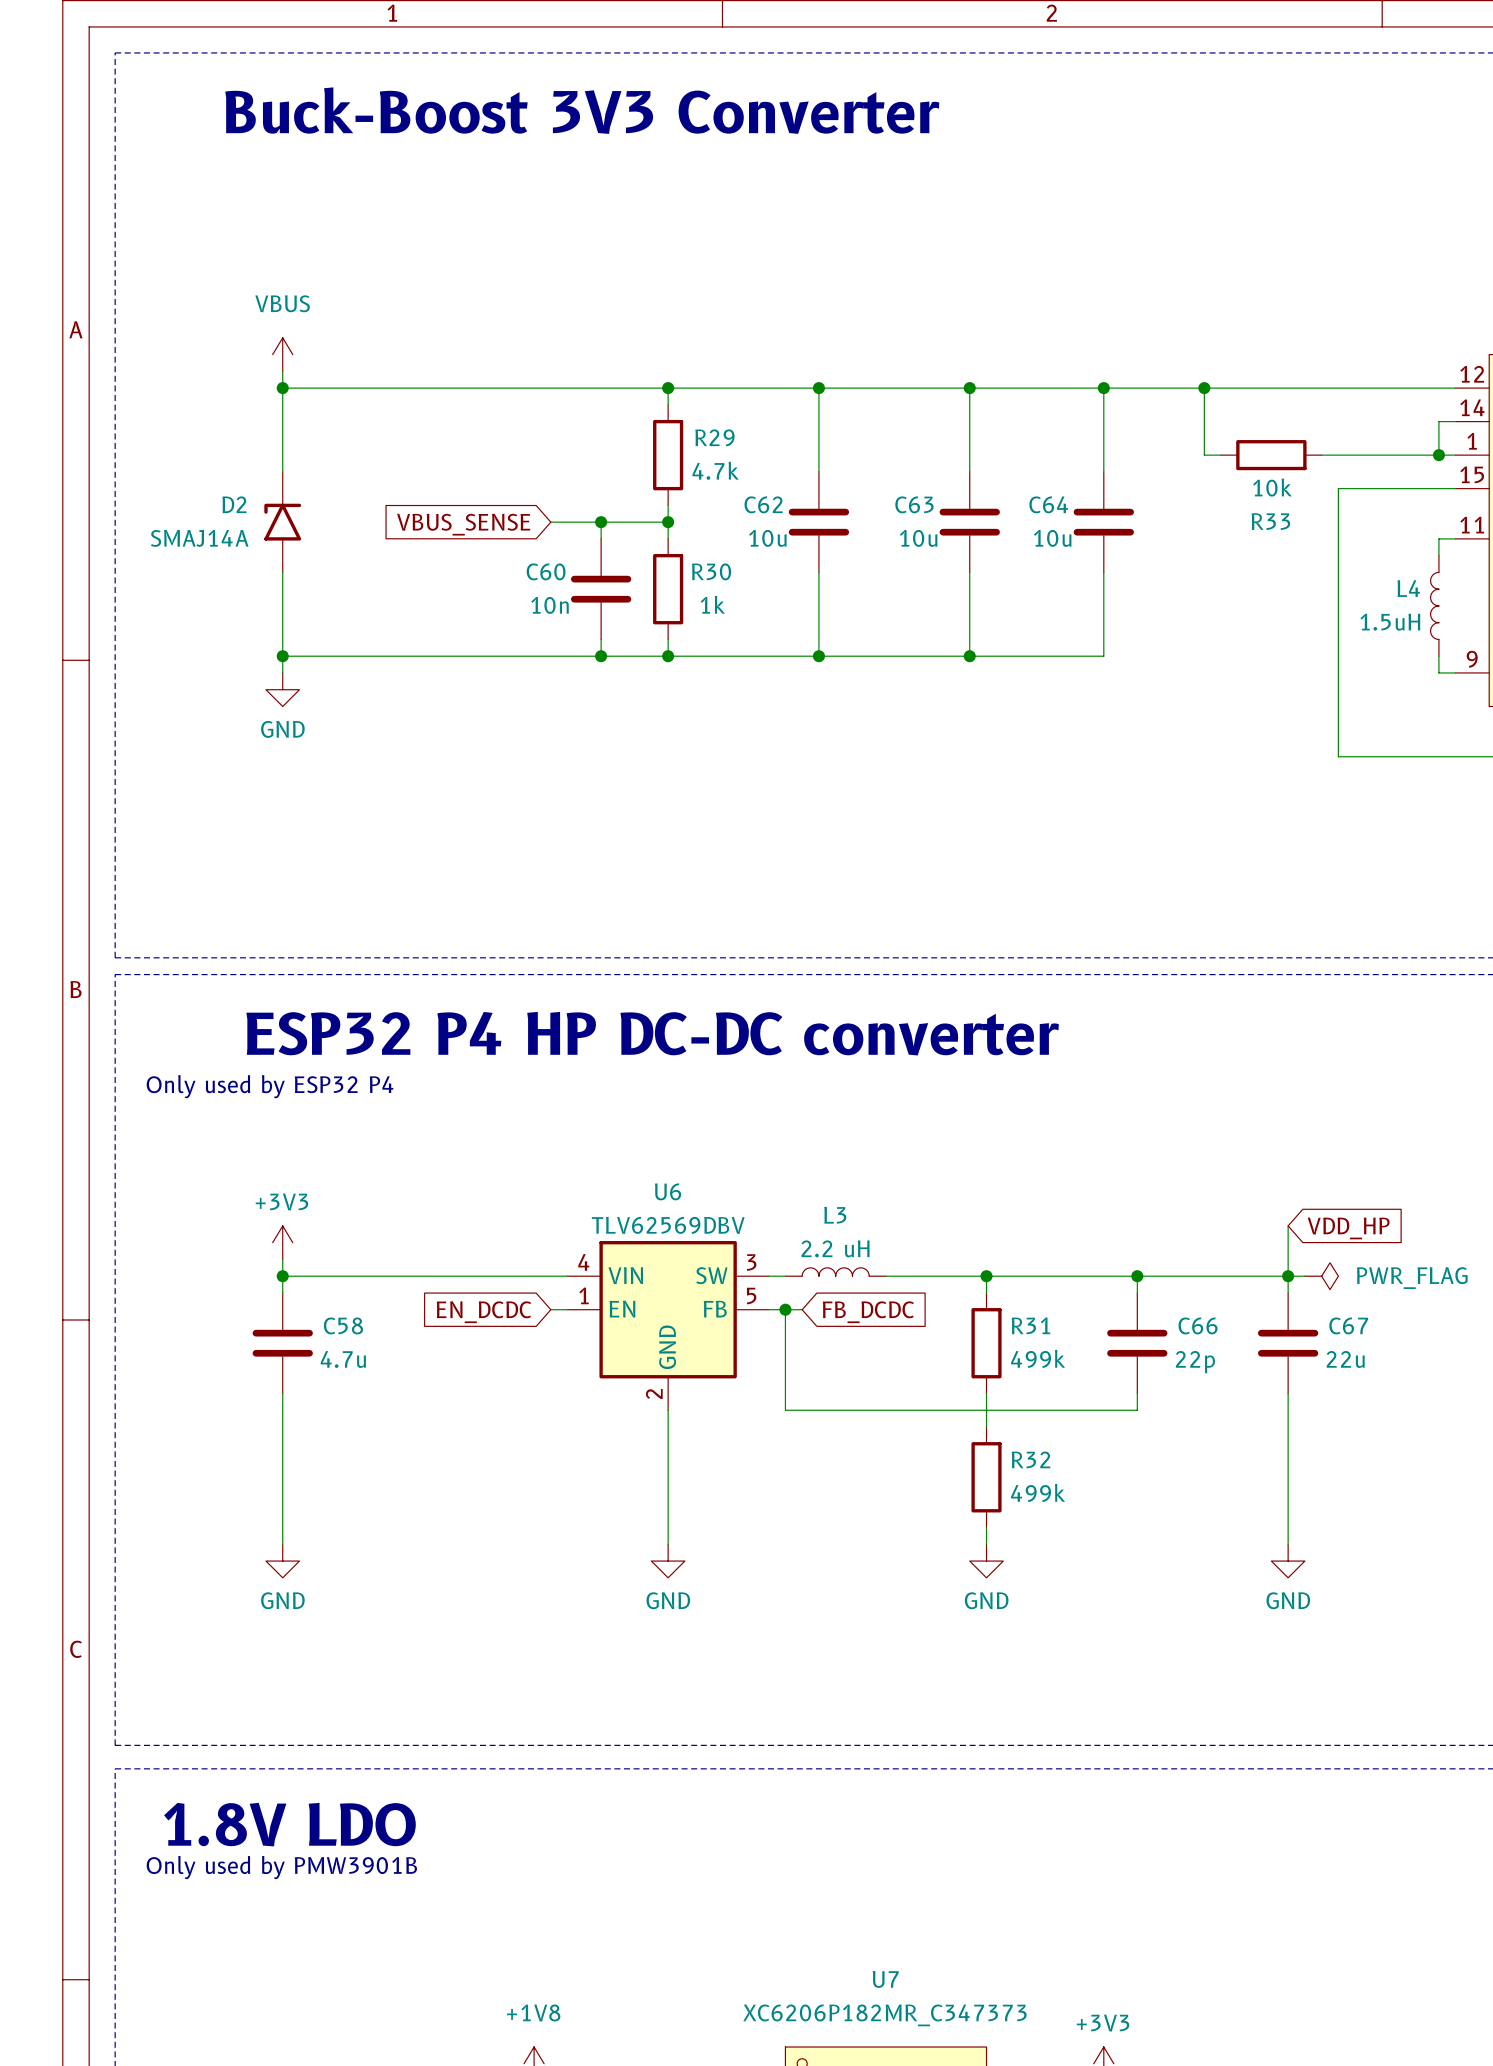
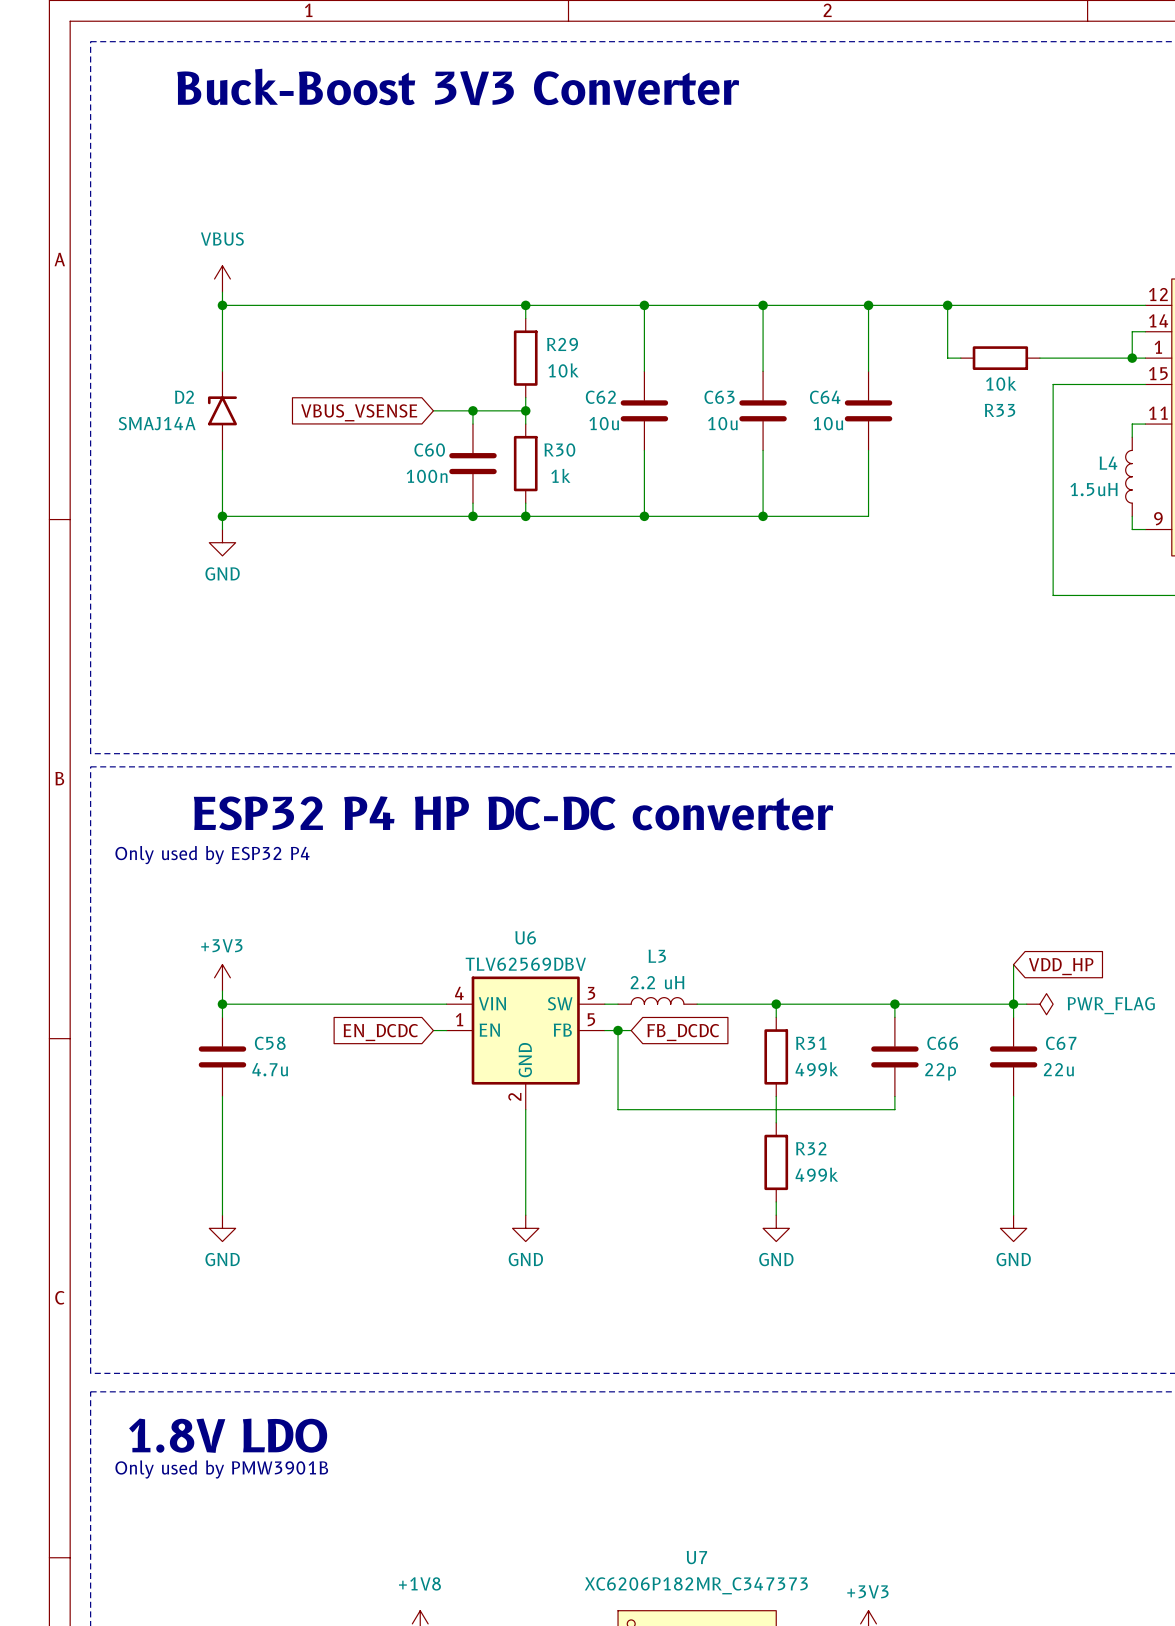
R29 value: 4.7k (715, 470) -> 10k (563, 370)
global label: VBUS_SENSE (463, 524) -> VBUS_VSENSE (359, 412)
C60 value: 10n (549, 605) -> 100n (427, 476)

